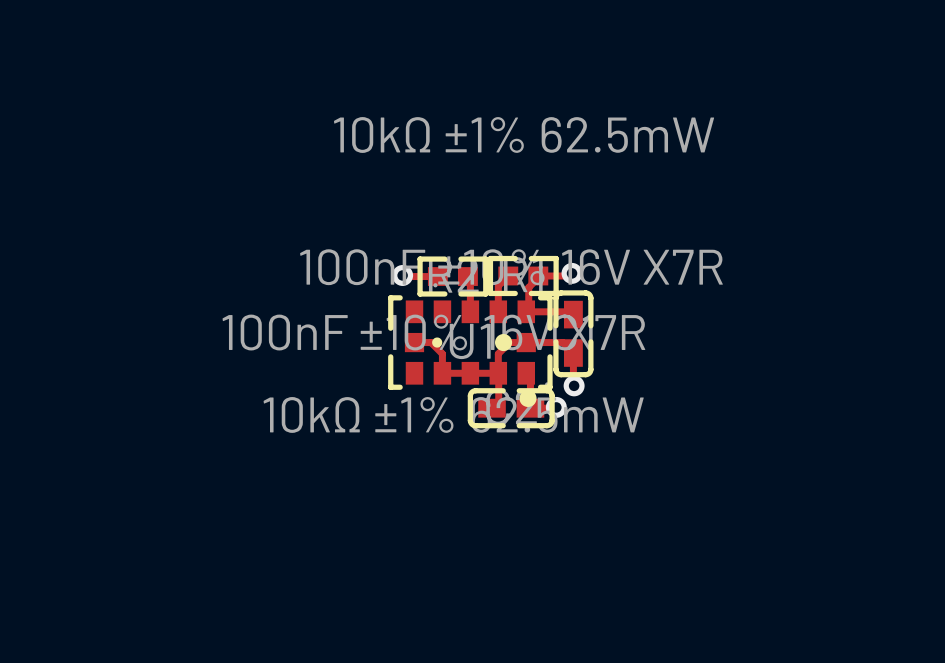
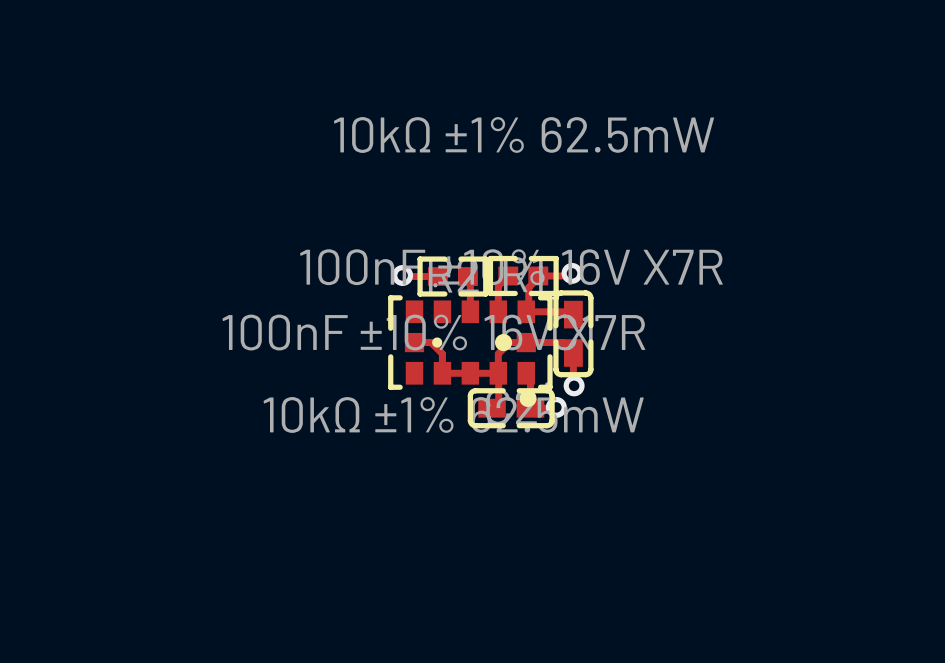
U1 name: U1 (470, 341) -> none

